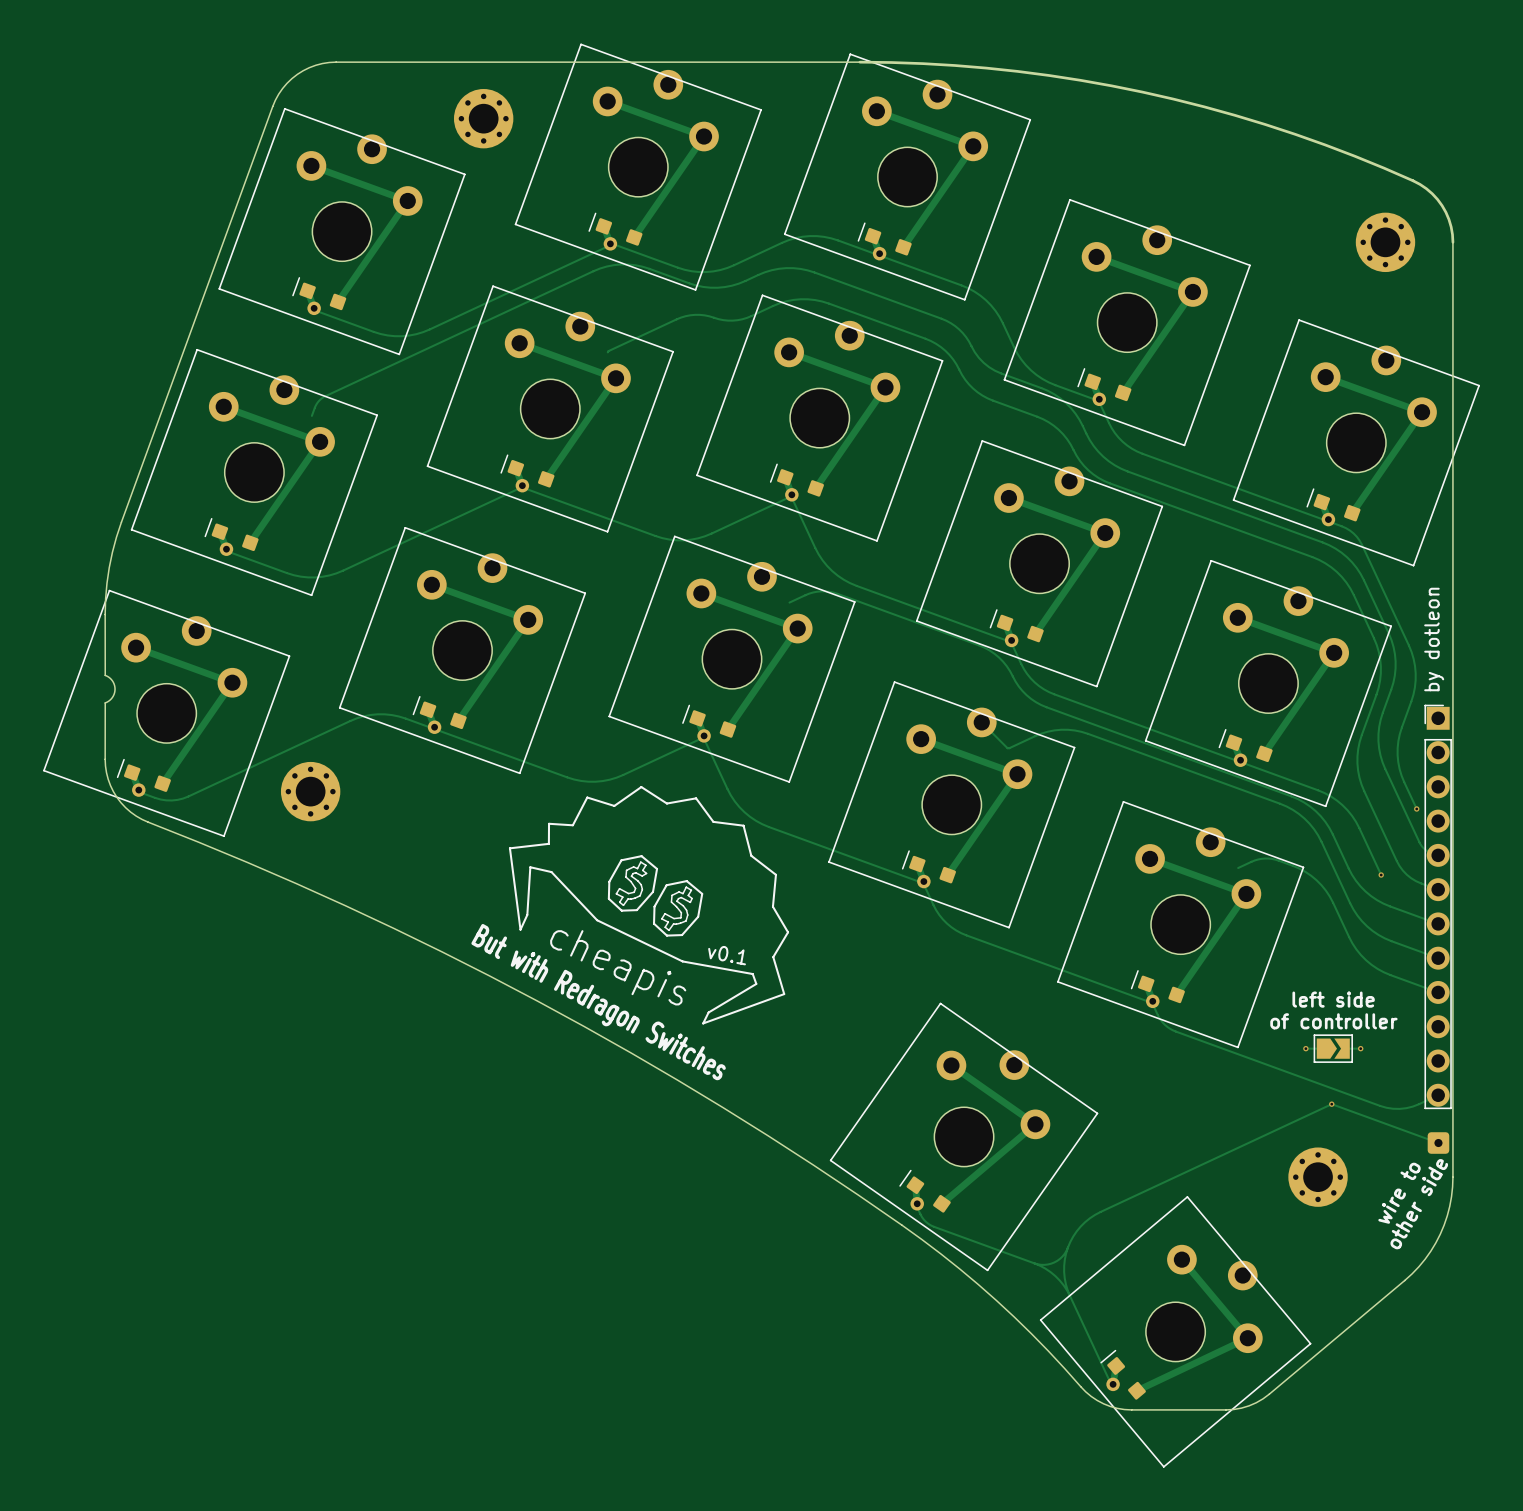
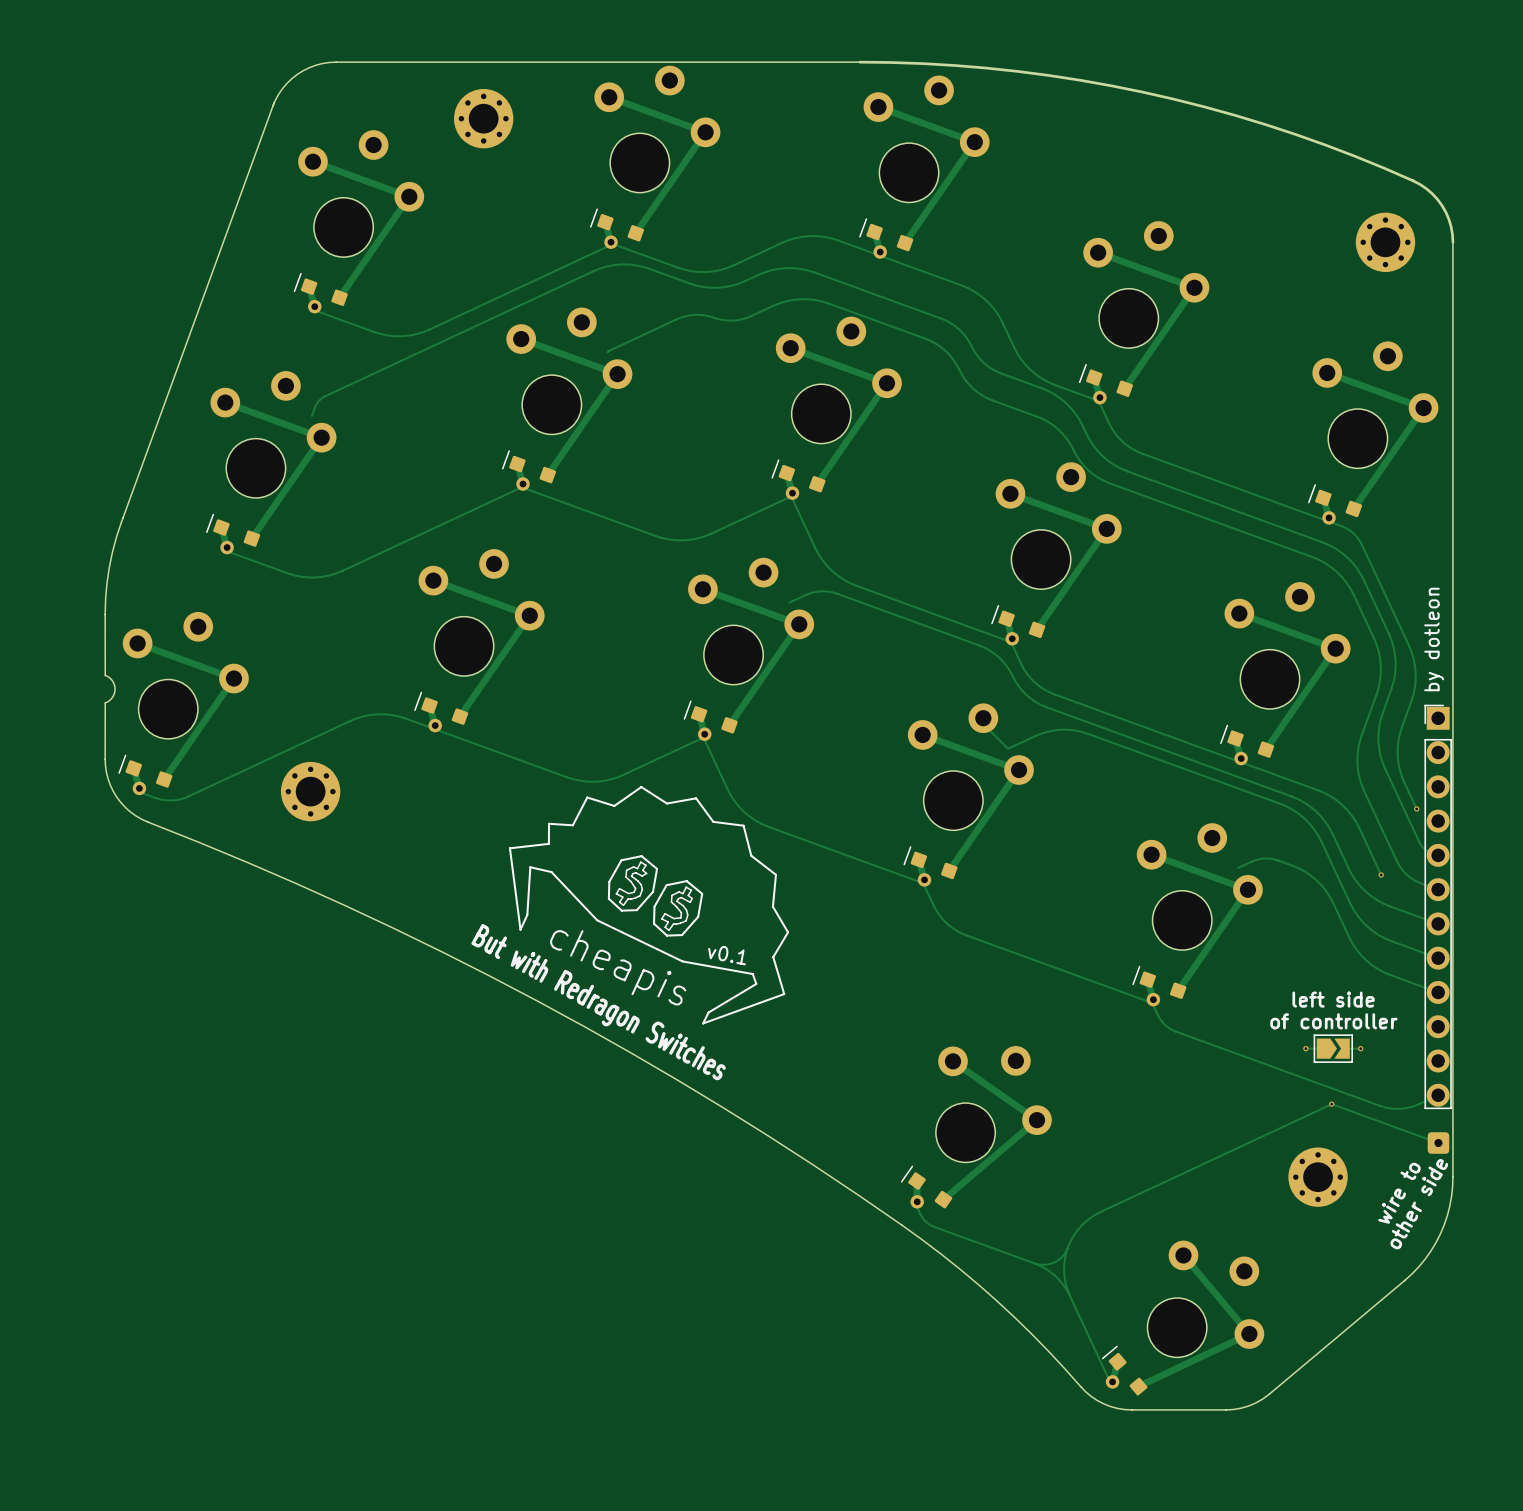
part: none -> (655, 157)
part: (638, 167) -> none
part: none -> (924, 167)
part: (907, 176) -> none
part: none -> (358, 221)
part: (342, 231) -> none
part: none -> (1144, 312)
part: (1127, 322) -> none
part: none -> (567, 399)
part: (550, 408) -> none
part: none -> (836, 408)
part: (819, 418) -> none
part: none -> (1373, 433)
part: (1356, 442) -> none
part: none -> (271, 462)
part: (254, 472) -> none
part: none -> (1056, 553)
part: (1039, 563) -> none
part: none -> (479, 640)
part: none -> (748, 649)
part: (462, 650) -> none
part: (732, 659) -> none
part: none -> (1285, 673)
part: (1268, 683) -> none
part: none -> (183, 703)
part: (166, 713) -> none
part: none -> (968, 795)
part: (951, 804) -> none
part: none -> (1197, 914)
part: (1180, 924) -> none
part: none -> (976, 1127)
part: (964, 1136) -> none
part: none -> (1183, 1318)
part: (1175, 1331) -> none

